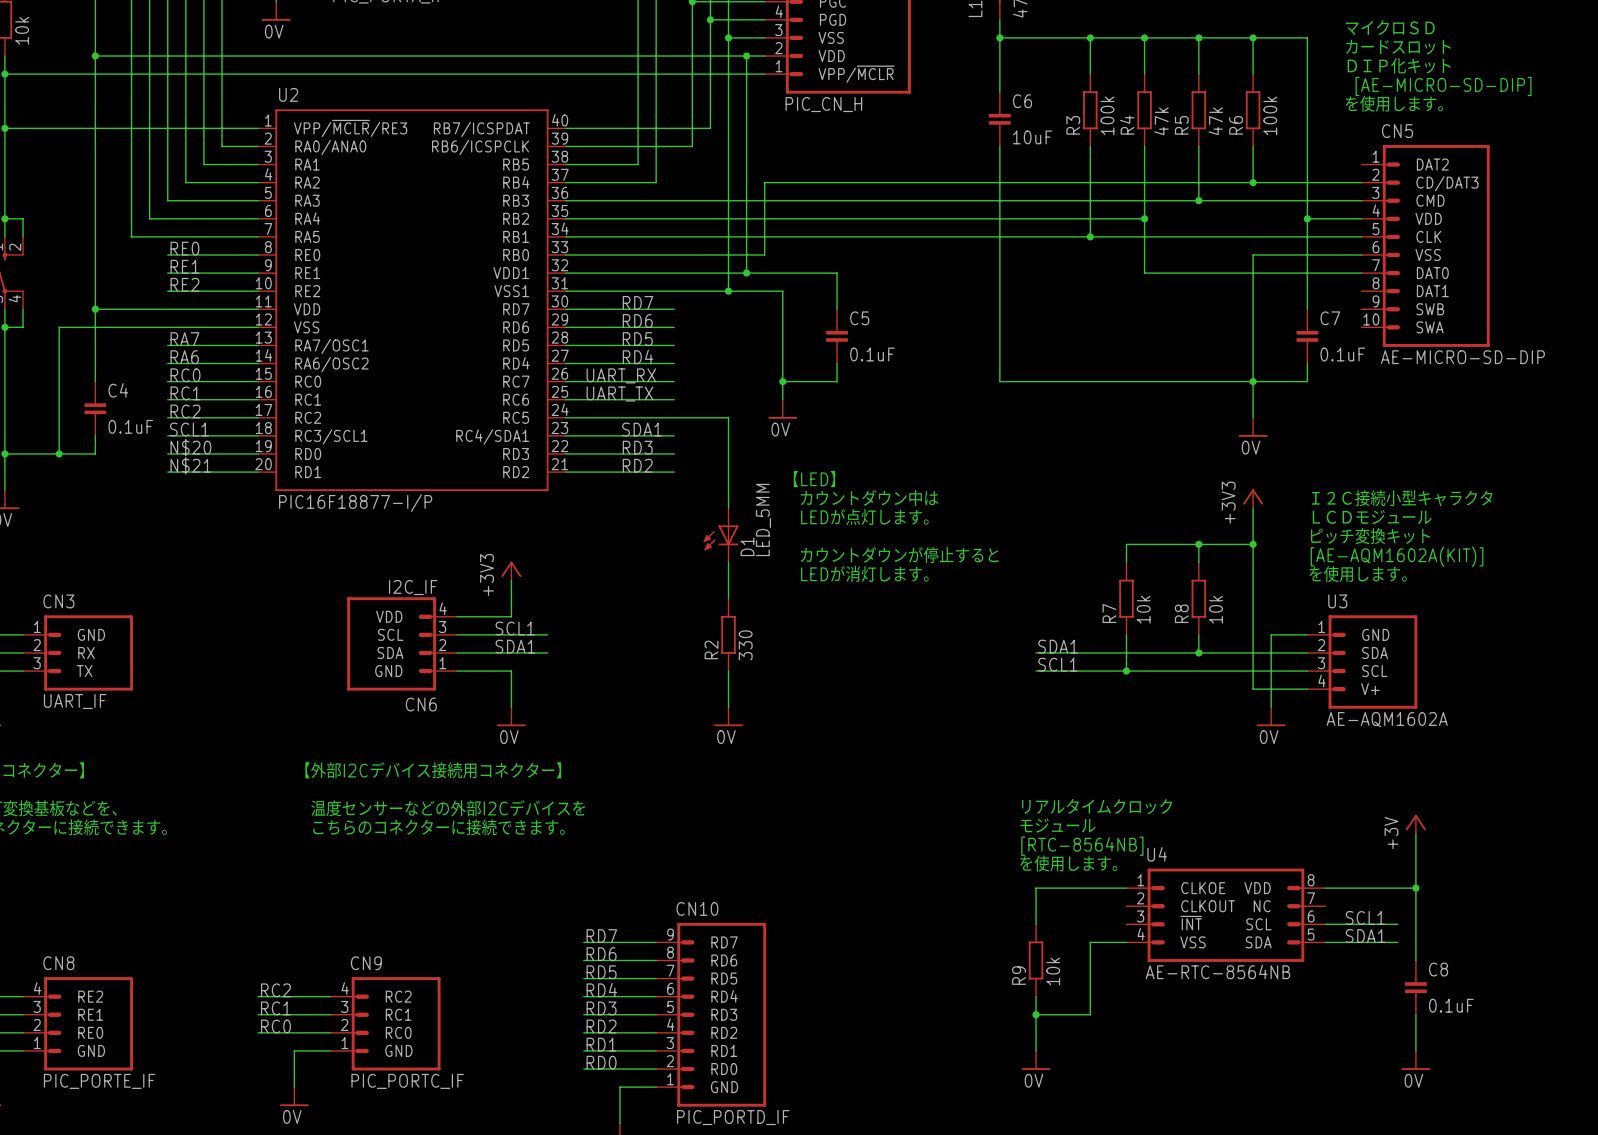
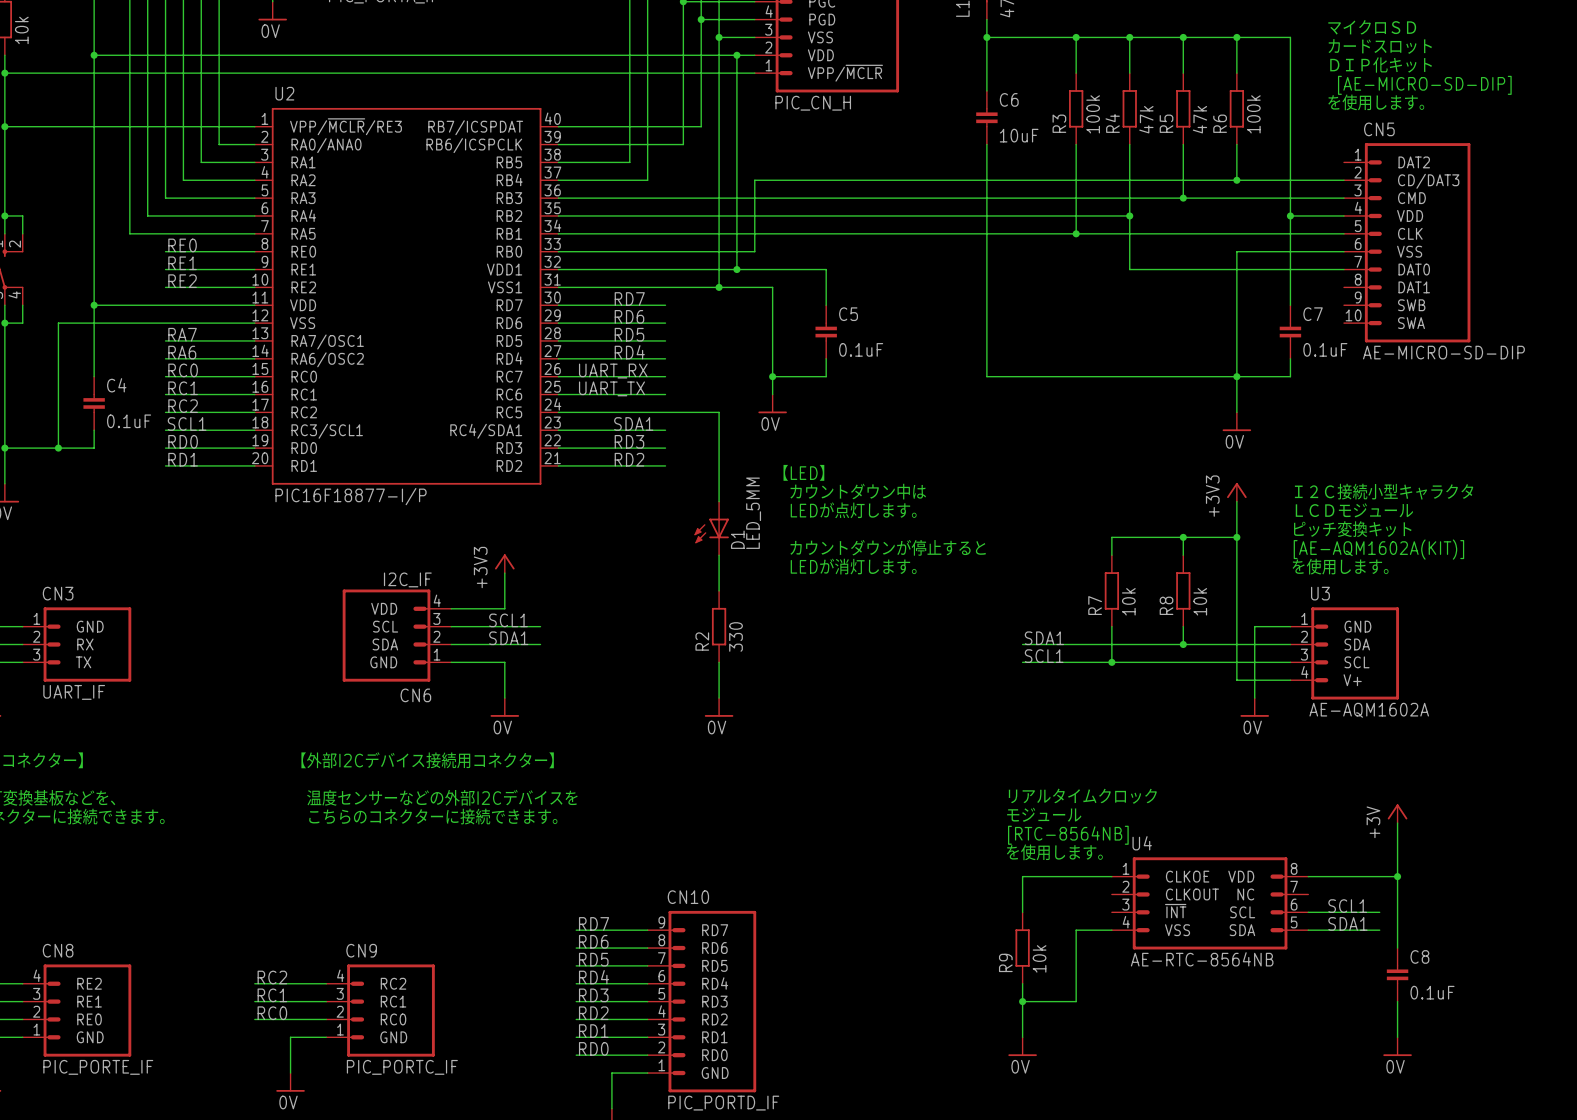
label: N$20 (190, 447) -> RD0 (183, 441)
label: N$21 (190, 465) -> RD1 (183, 459)

